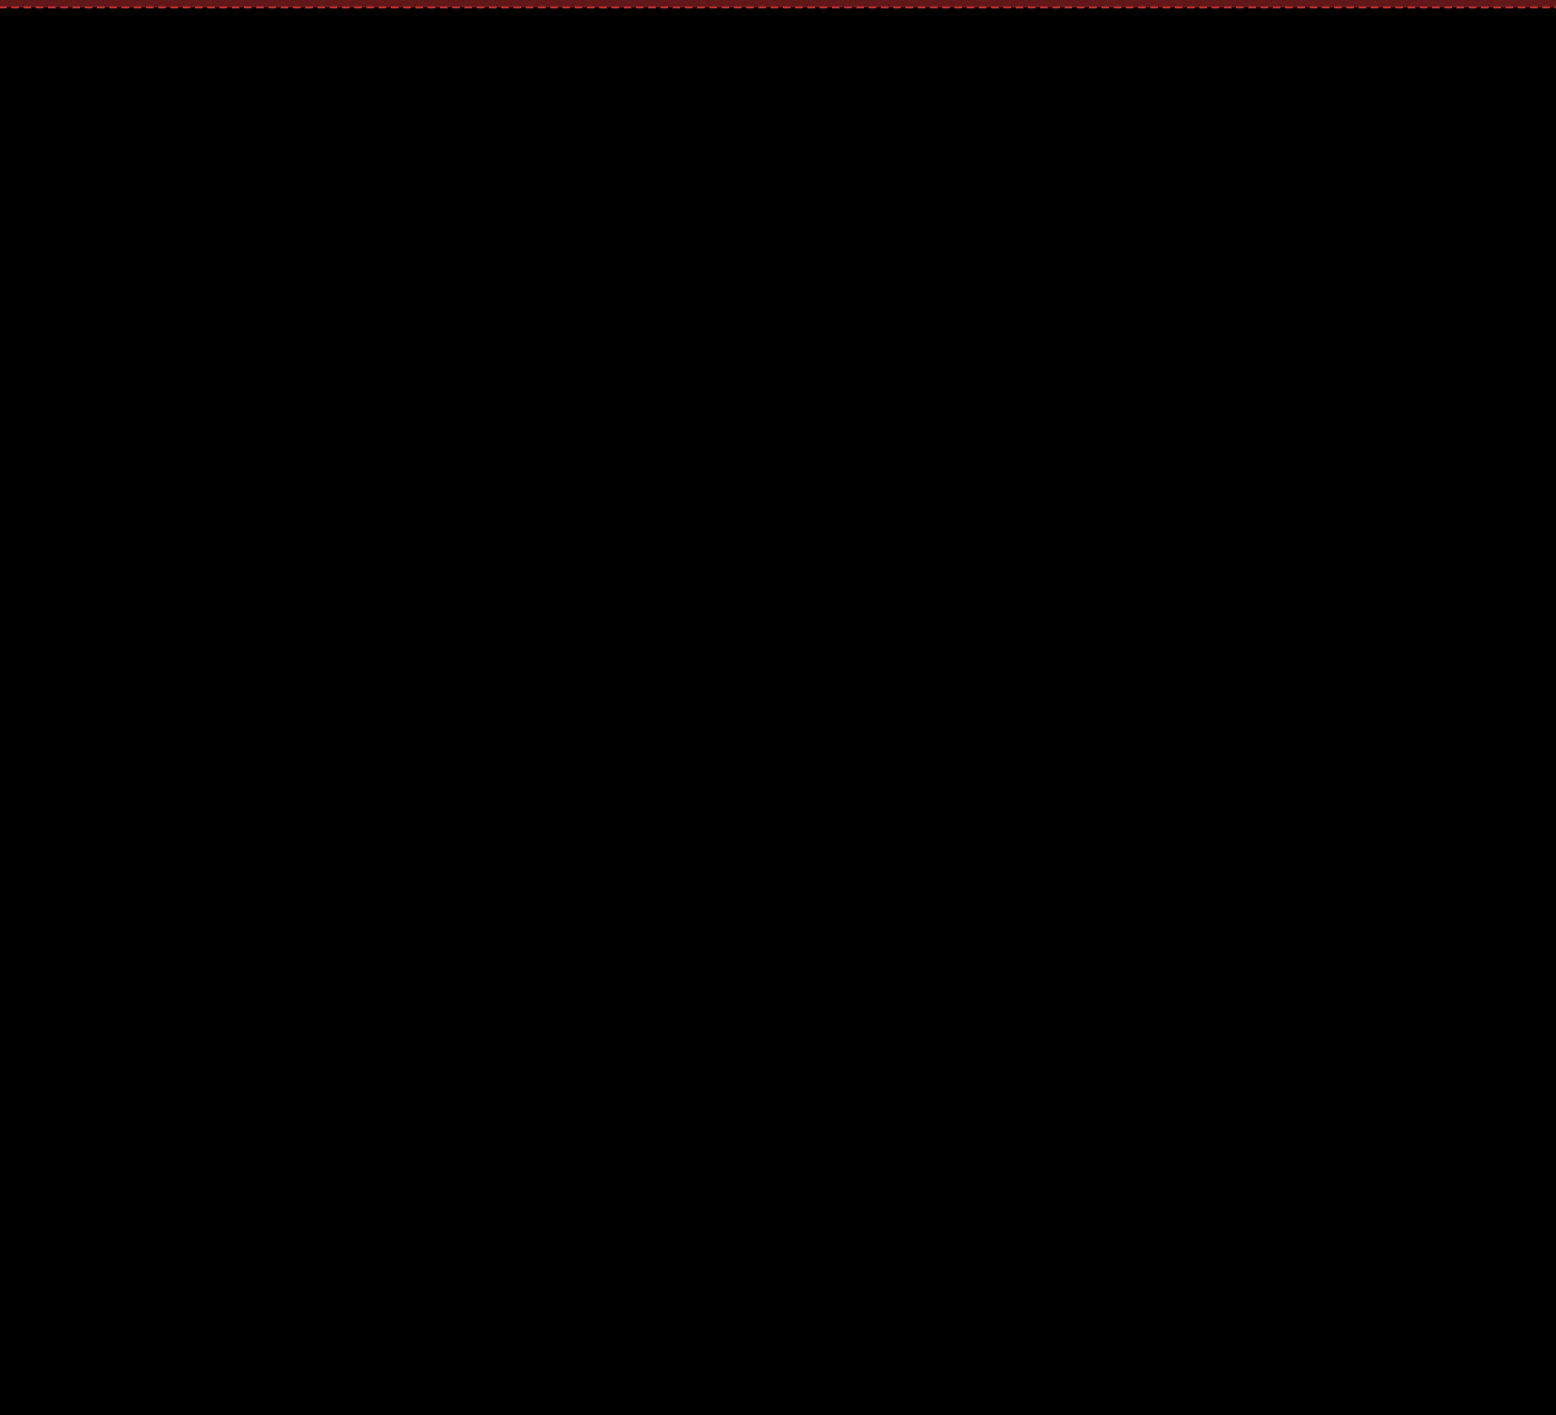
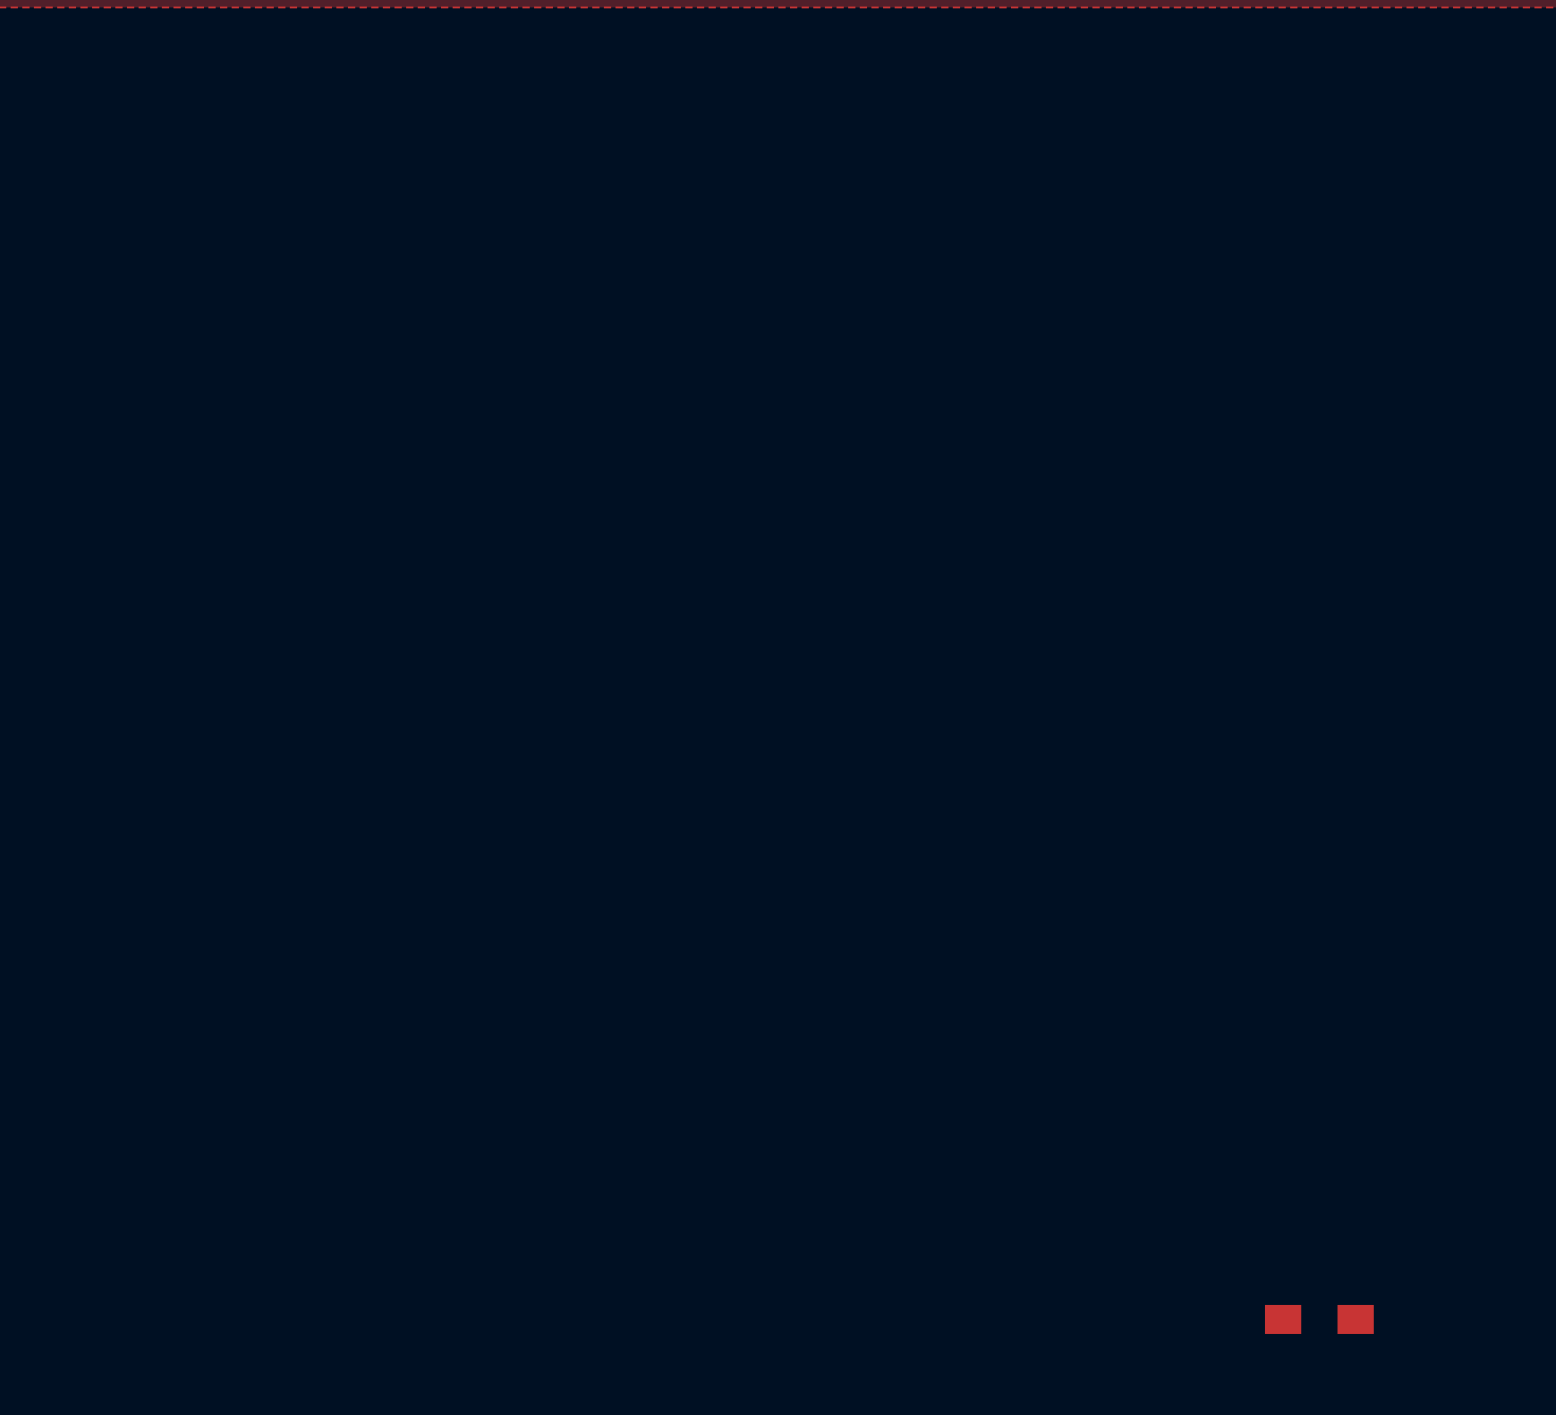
part: none -> (1319, 1319)

